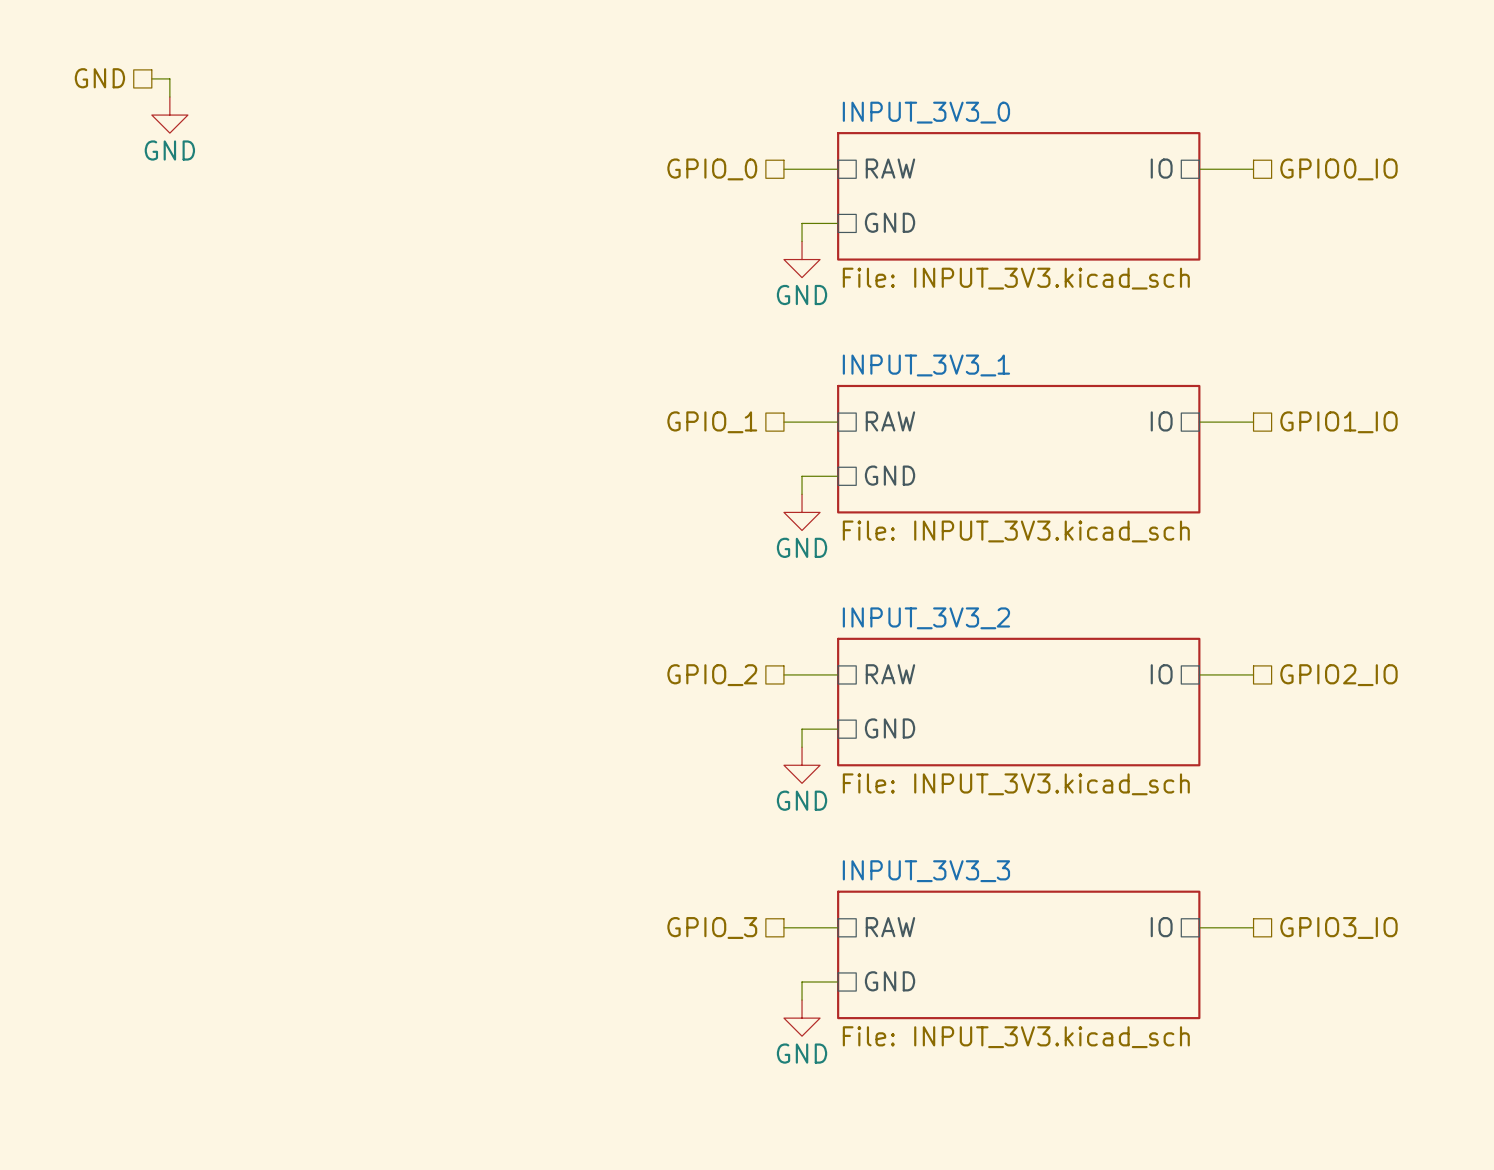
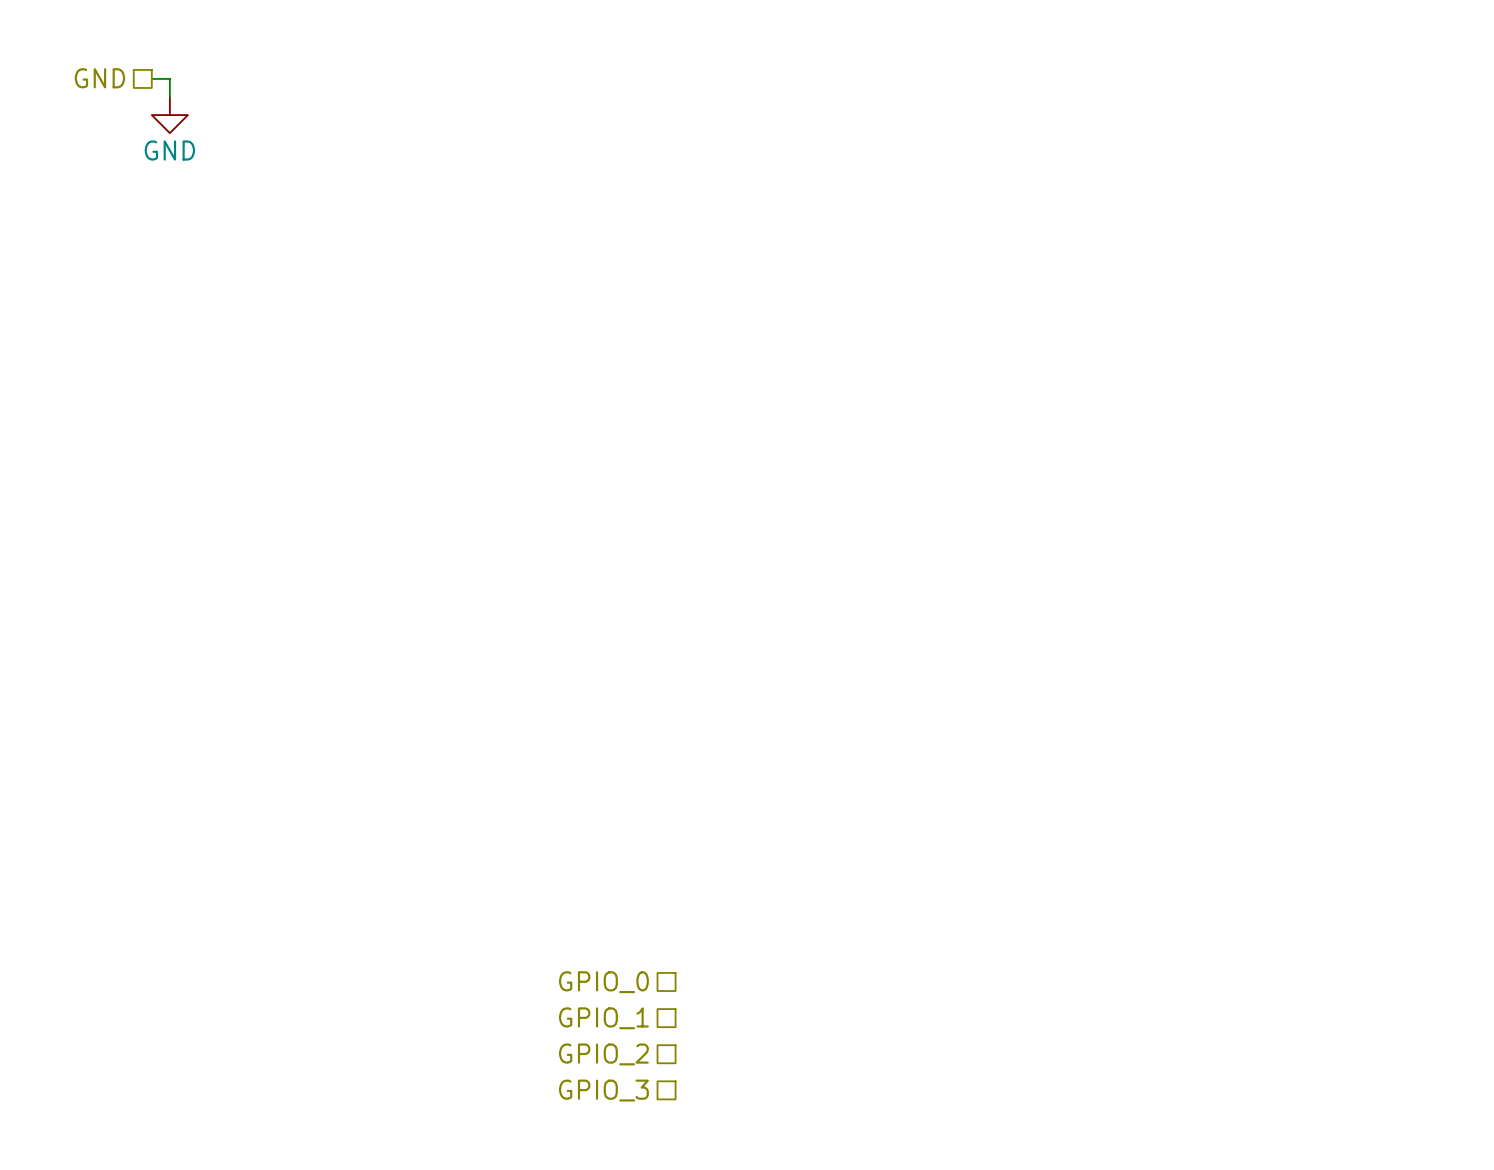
sheet pin: RAW (890, 168) -> none
sheet pin: IO (1161, 168) -> none
hierarchical label: GPIO_0 (712, 169) -> none
wire: (783, 169) (838, 169) -> none
wire: (1199, 169) (1253, 169) -> none
hierarchical label: GPIO0_IO (1338, 169) -> none
sheet INPUT_3V3_0: File: INPUT_3V3.kicad_sch (1018, 196) -> none
sheet pin: GND (890, 222) -> none
wire: (838, 223) (802, 223) (802, 241) -> none
power symbol: GND (802, 259) -> none
sheet pin: RAW (890, 421) -> none
sheet pin: IO (1161, 421) -> none
hierarchical label: GPIO_1 (712, 422) -> none
wire: (783, 422) (838, 422) -> none
wire: (1199, 422) (1253, 422) -> none
hierarchical label: GPIO1_IO (1338, 422) -> none
sheet INPUT_3V3_1: File: INPUT_3V3.kicad_sch (1018, 449) -> none
sheet pin: GND (890, 475) -> none
wire: (838, 476) (802, 476) (802, 494) -> none
power symbol: GND (802, 512) -> none
wire: (783, 674) (838, 674) -> none
sheet pin: RAW (890, 674) -> none
sheet pin: IO (1161, 674) -> none
wire: (1199, 674) (1253, 674) -> none
hierarchical label: GPIO_2 (712, 675) -> none
hierarchical label: GPIO2_IO (1338, 675) -> none
sheet INPUT_3V3_2: File: INPUT_3V3.kicad_sch (1018, 702) -> none
sheet pin: GND (890, 728) -> none
wire: (838, 729) (802, 729) (802, 747) -> none
power symbol: GND (802, 765) -> none
wire: (783, 927) (838, 927) -> none
sheet pin: RAW (890, 927) -> none
sheet pin: IO (1161, 927) -> none
wire: (1199, 927) (1253, 927) -> none
hierarchical label position: GPIO_3 (712, 928) -> GPIO_3 (603, 1090)
hierarchical label: GPIO3_IO (1338, 928) -> none
sheet INPUT_3V3_3: File: INPUT_3V3.kicad_sch (1018, 954) -> none
sheet pin: GND (890, 981) -> none
hierarchical label: none -> GPIO_0 (603, 982)
wire: (838, 982) (802, 982) (802, 1000) -> none
hierarchical label: none -> GPIO_1 (603, 1018)
power symbol: GND (802, 1018) -> none
hierarchical label: none -> GPIO_2 (603, 1054)

